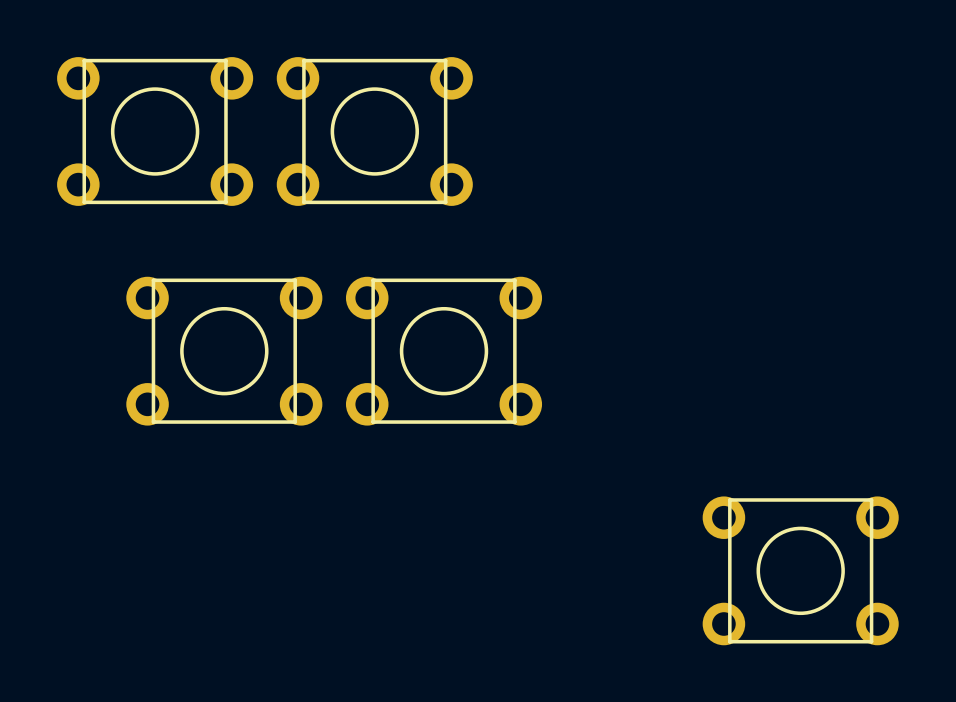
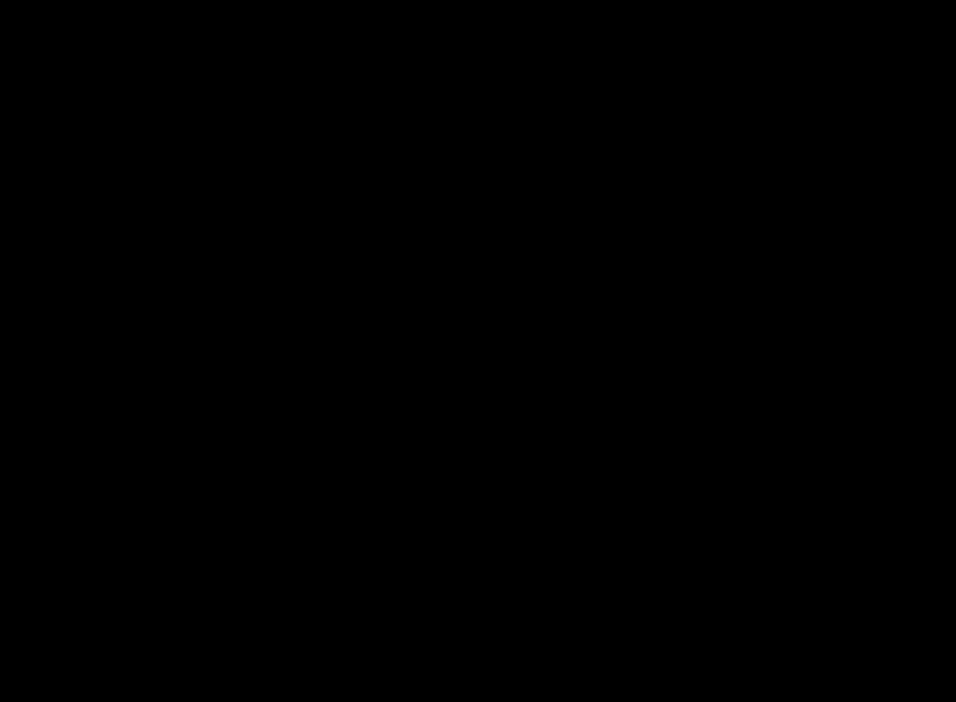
part: (155, 131) -> none
part: (374, 131) -> none
part: (224, 351) -> none
part: (444, 351) -> none
part: (800, 570) -> none

